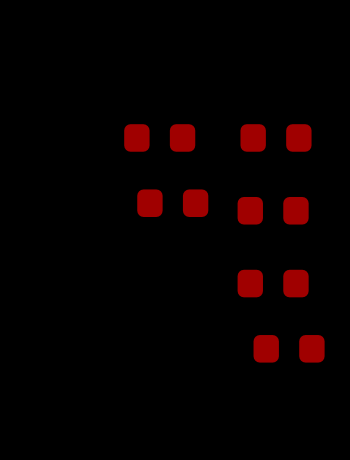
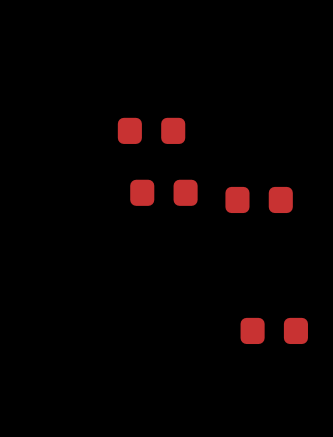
part: (276, 137) -> none
part: (273, 283) -> none

